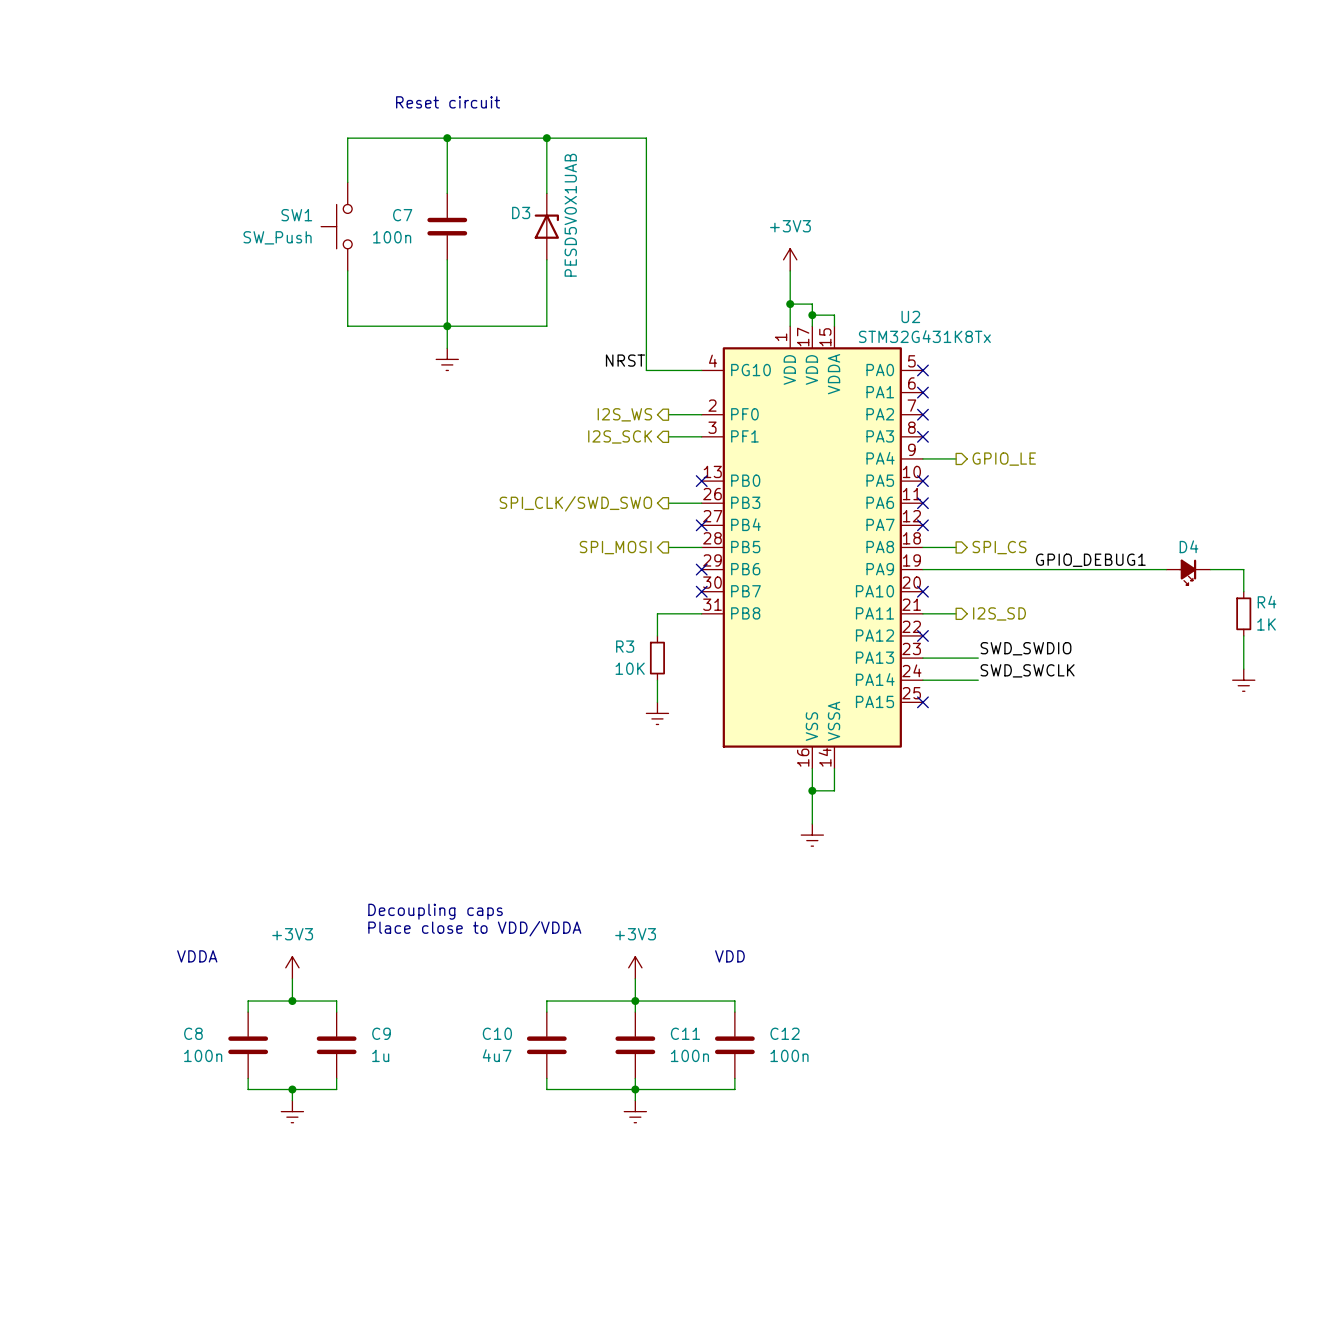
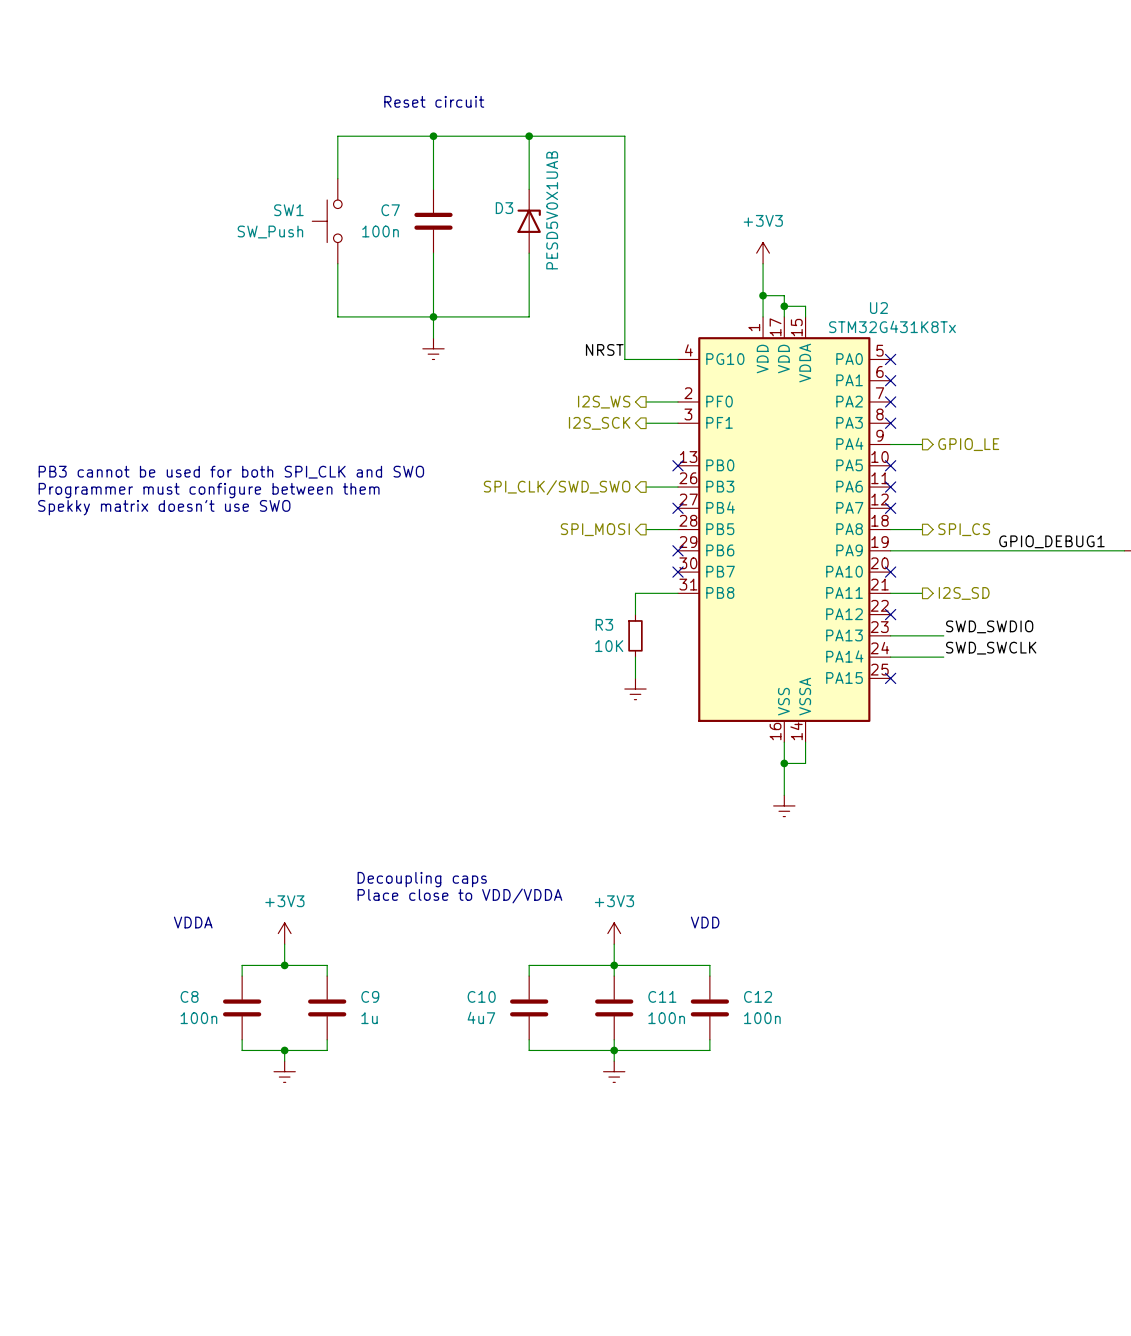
text: none -> PB3 cannot be used for both SPI_CLK and SWO (231, 472)
text: none -> Programmer must configure between them (209, 490)
text: none -> Spekky matrix doesn't use SWO (164, 507)

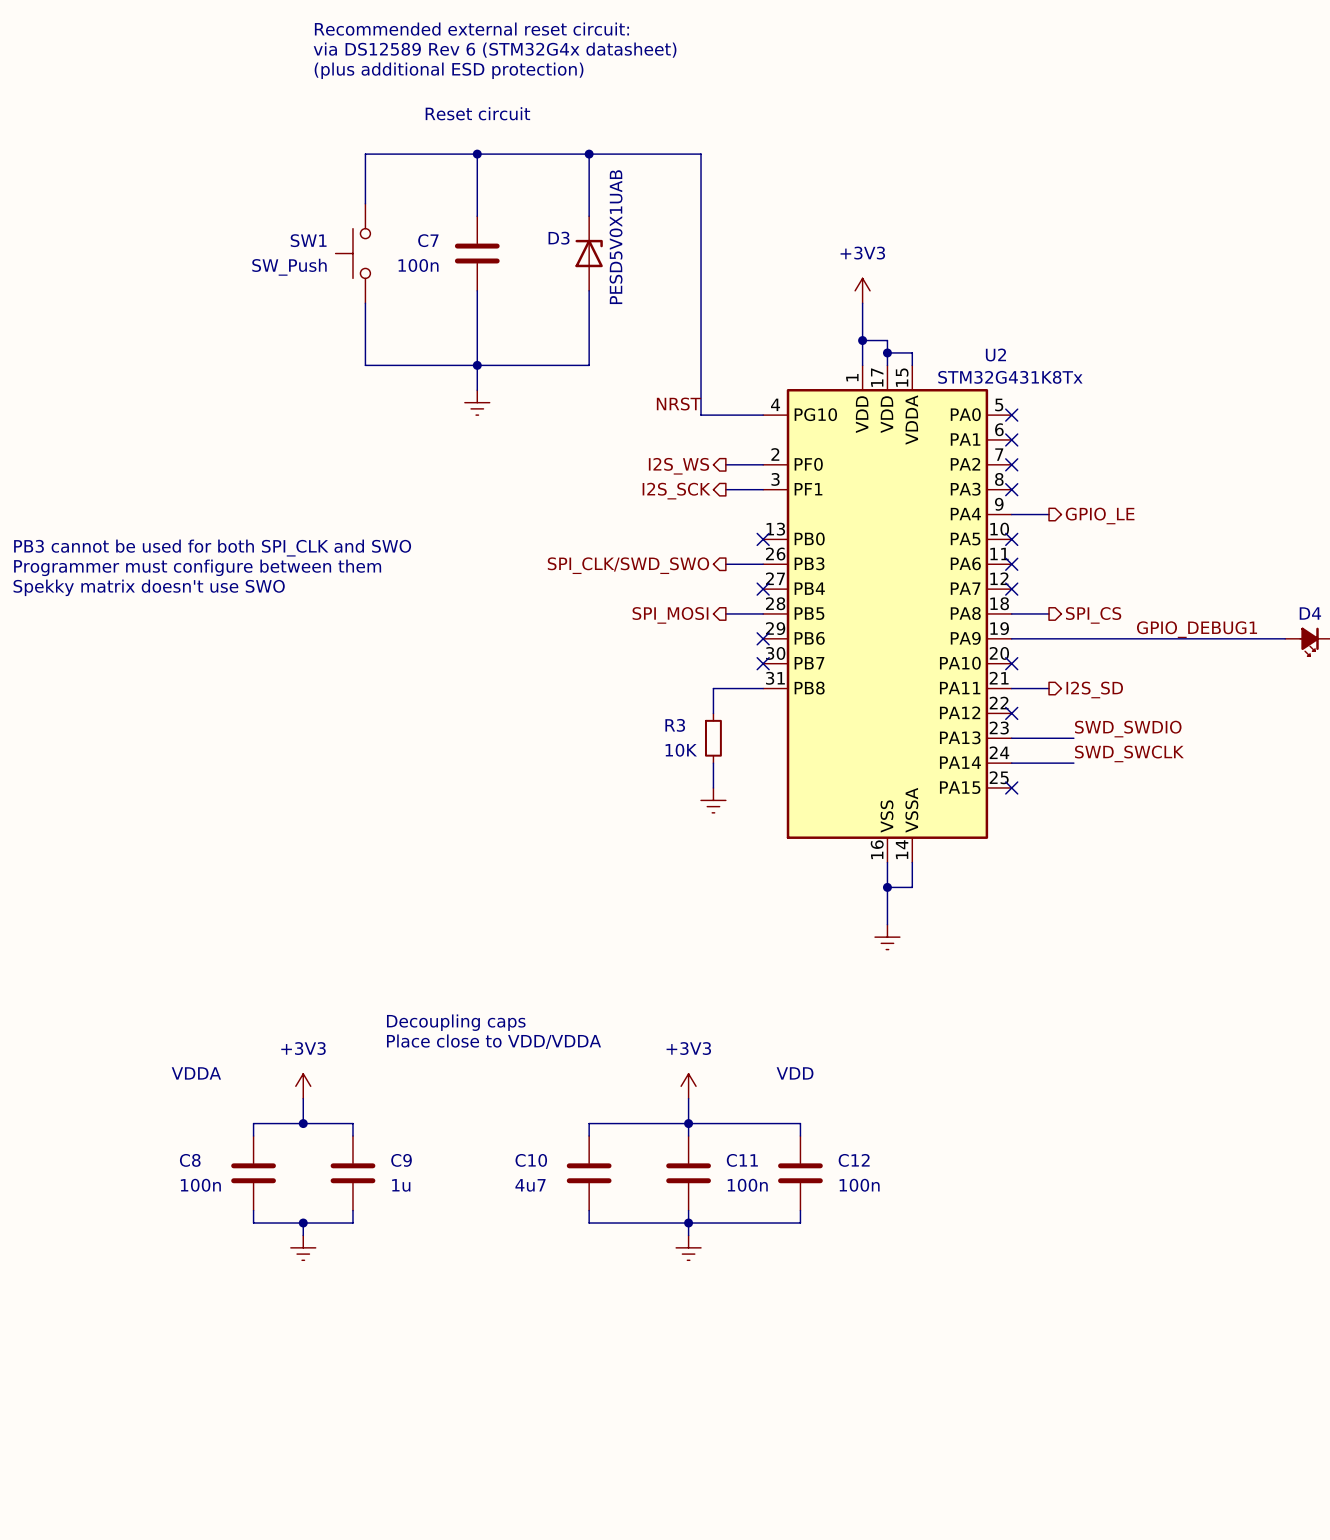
text: none -> Recommended external reset circuit: (471, 29)
text: none -> via DS12589 Rev 6 (STM32G4x datasheet) (495, 50)
text: none -> (plus additional ESD protection) (449, 70)

